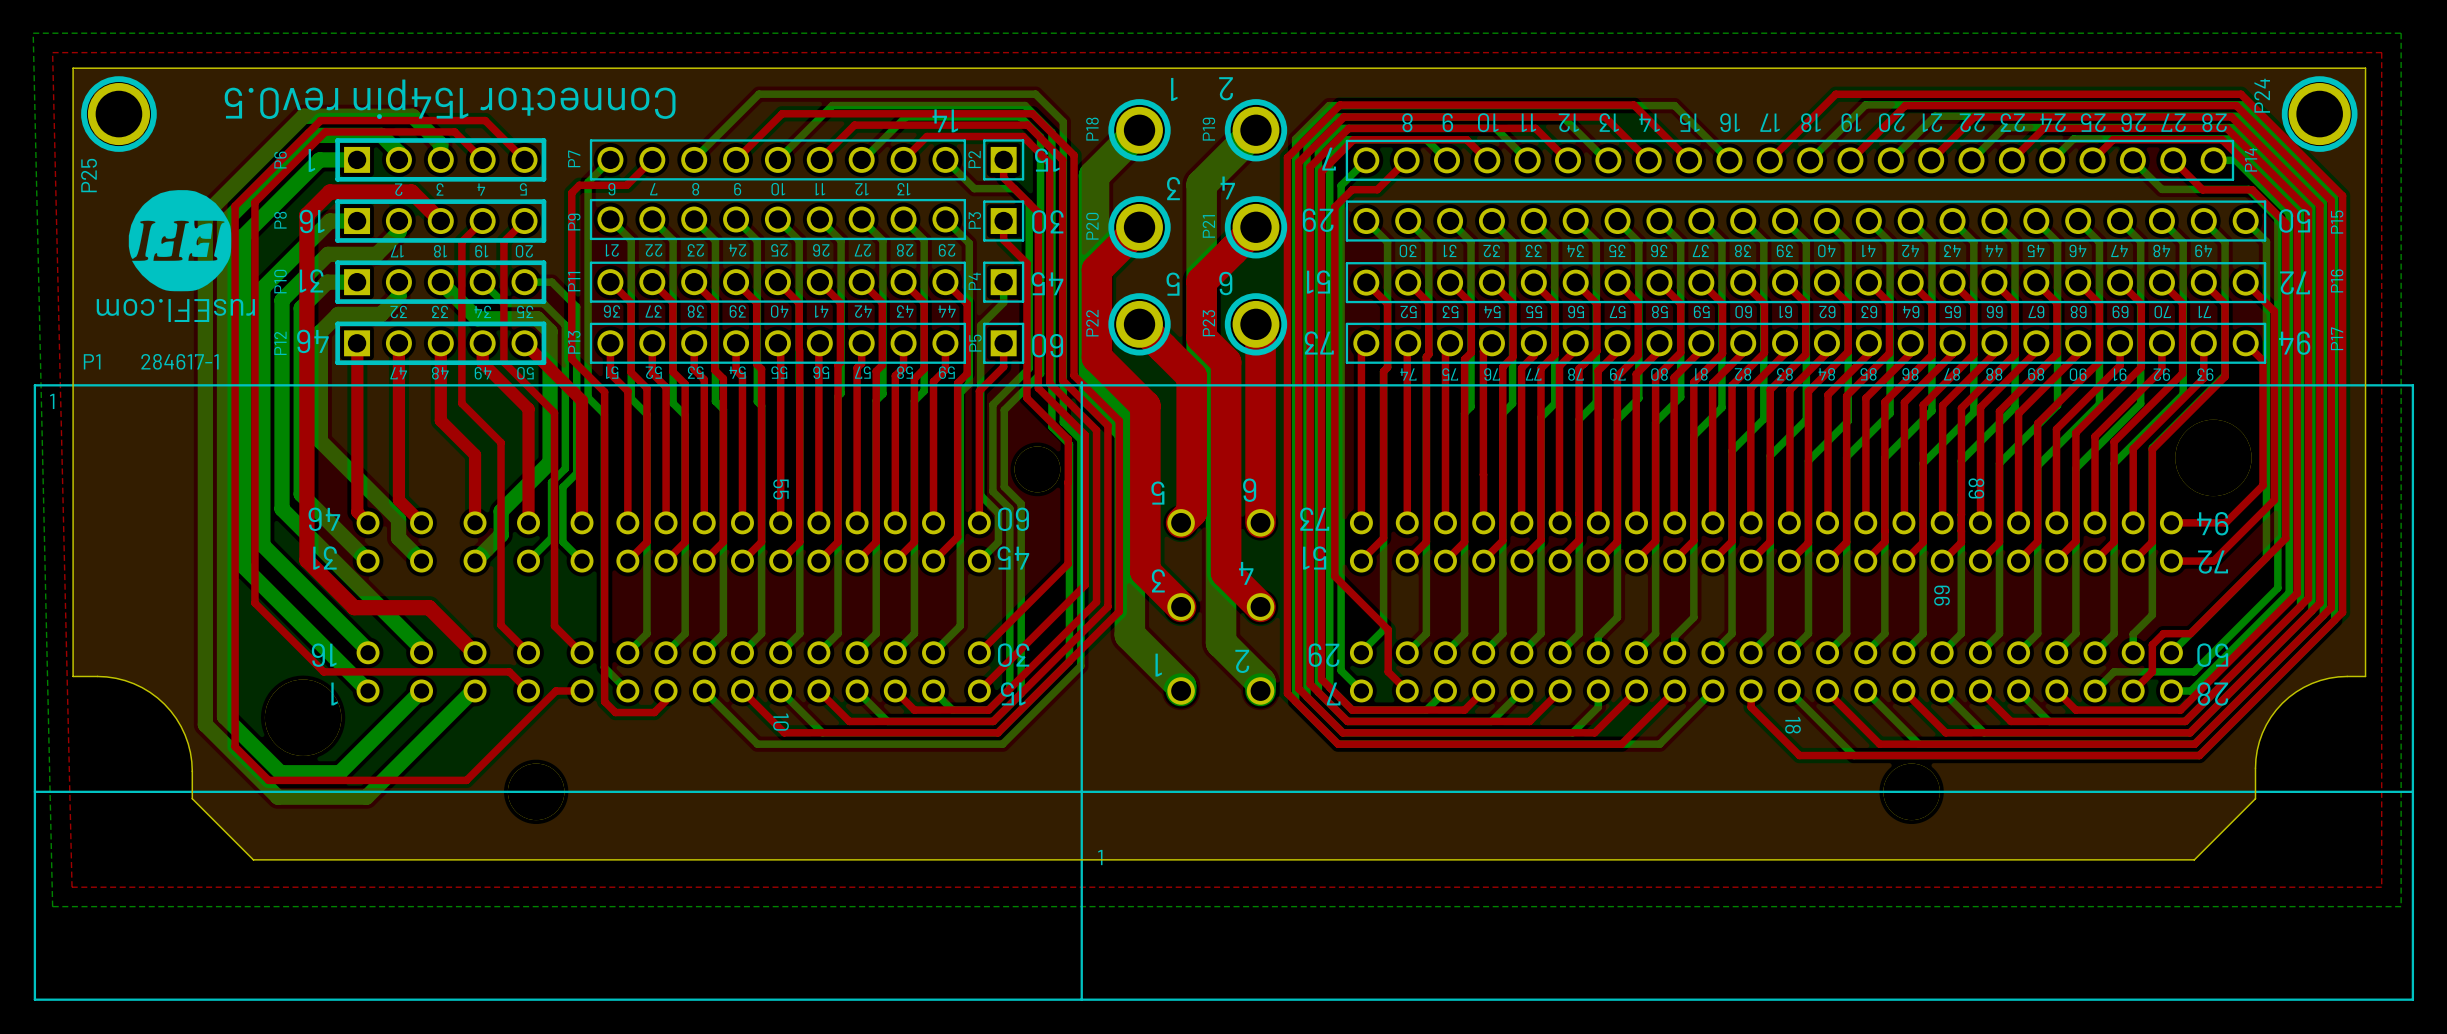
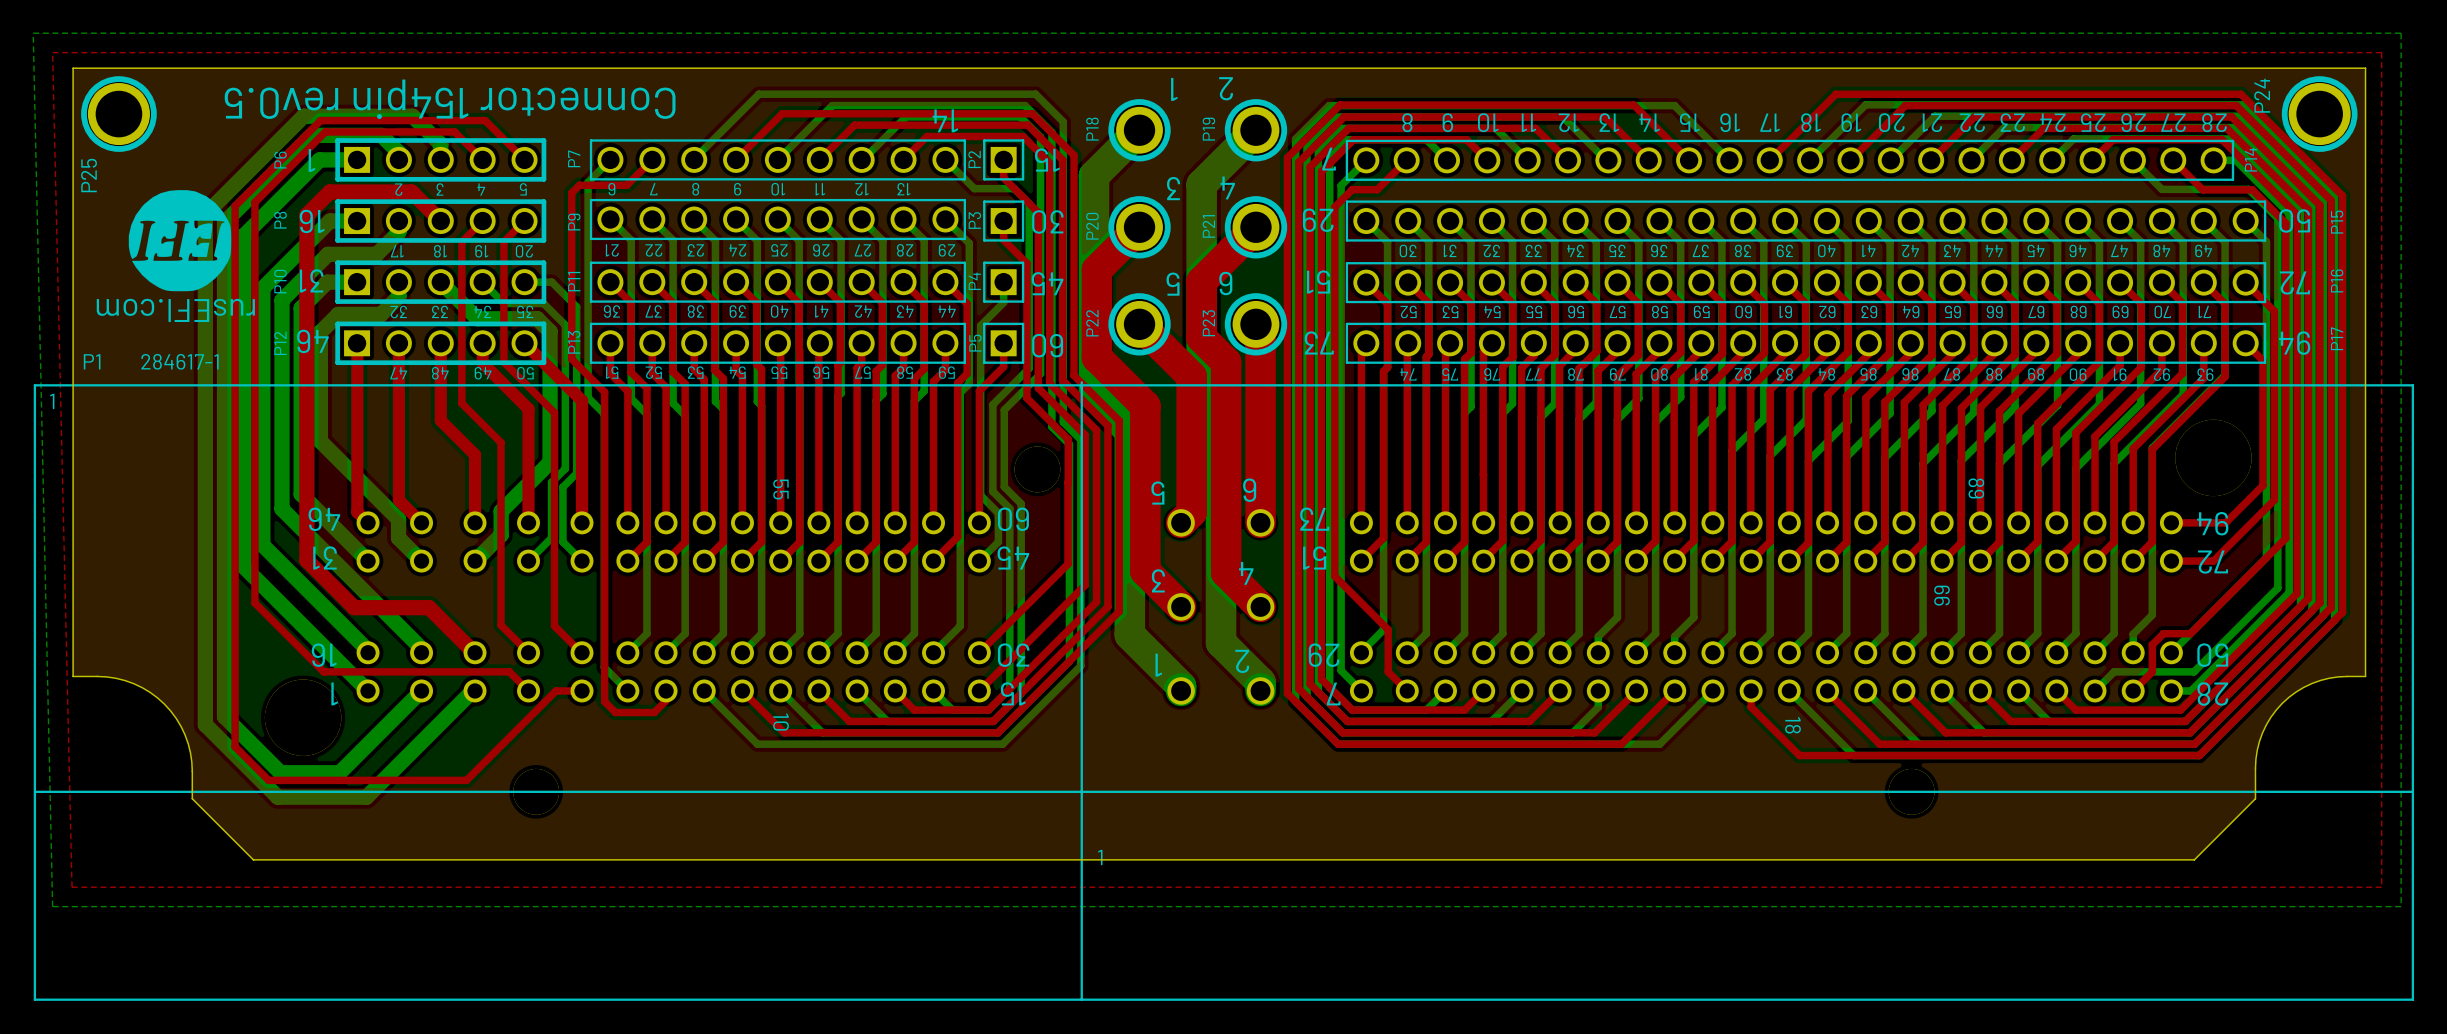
P1 footprint: [33, 381, 2415, 1001] -> [33, 381, 2415, 1001]

